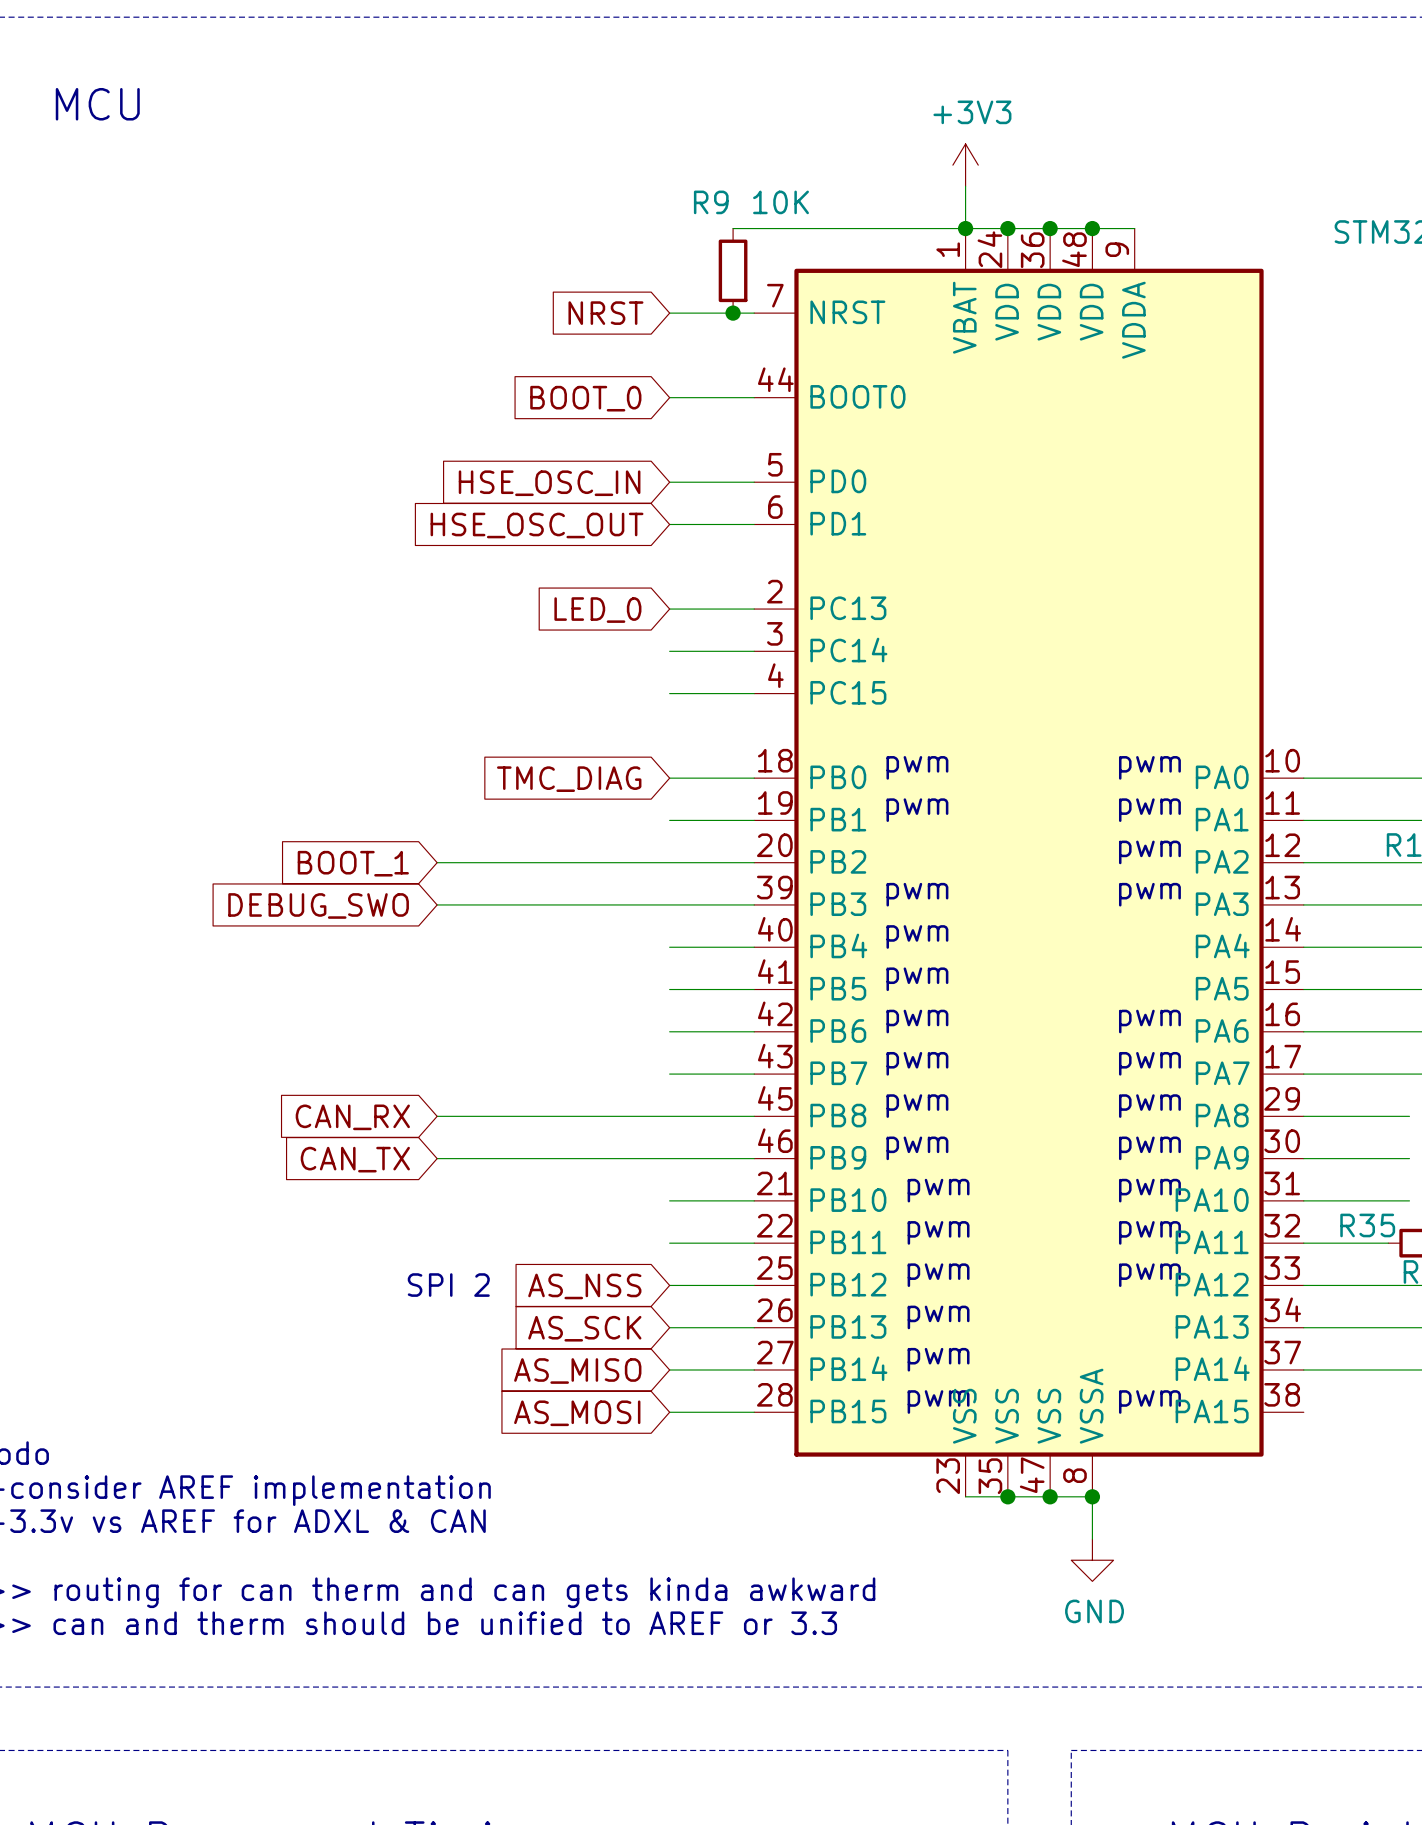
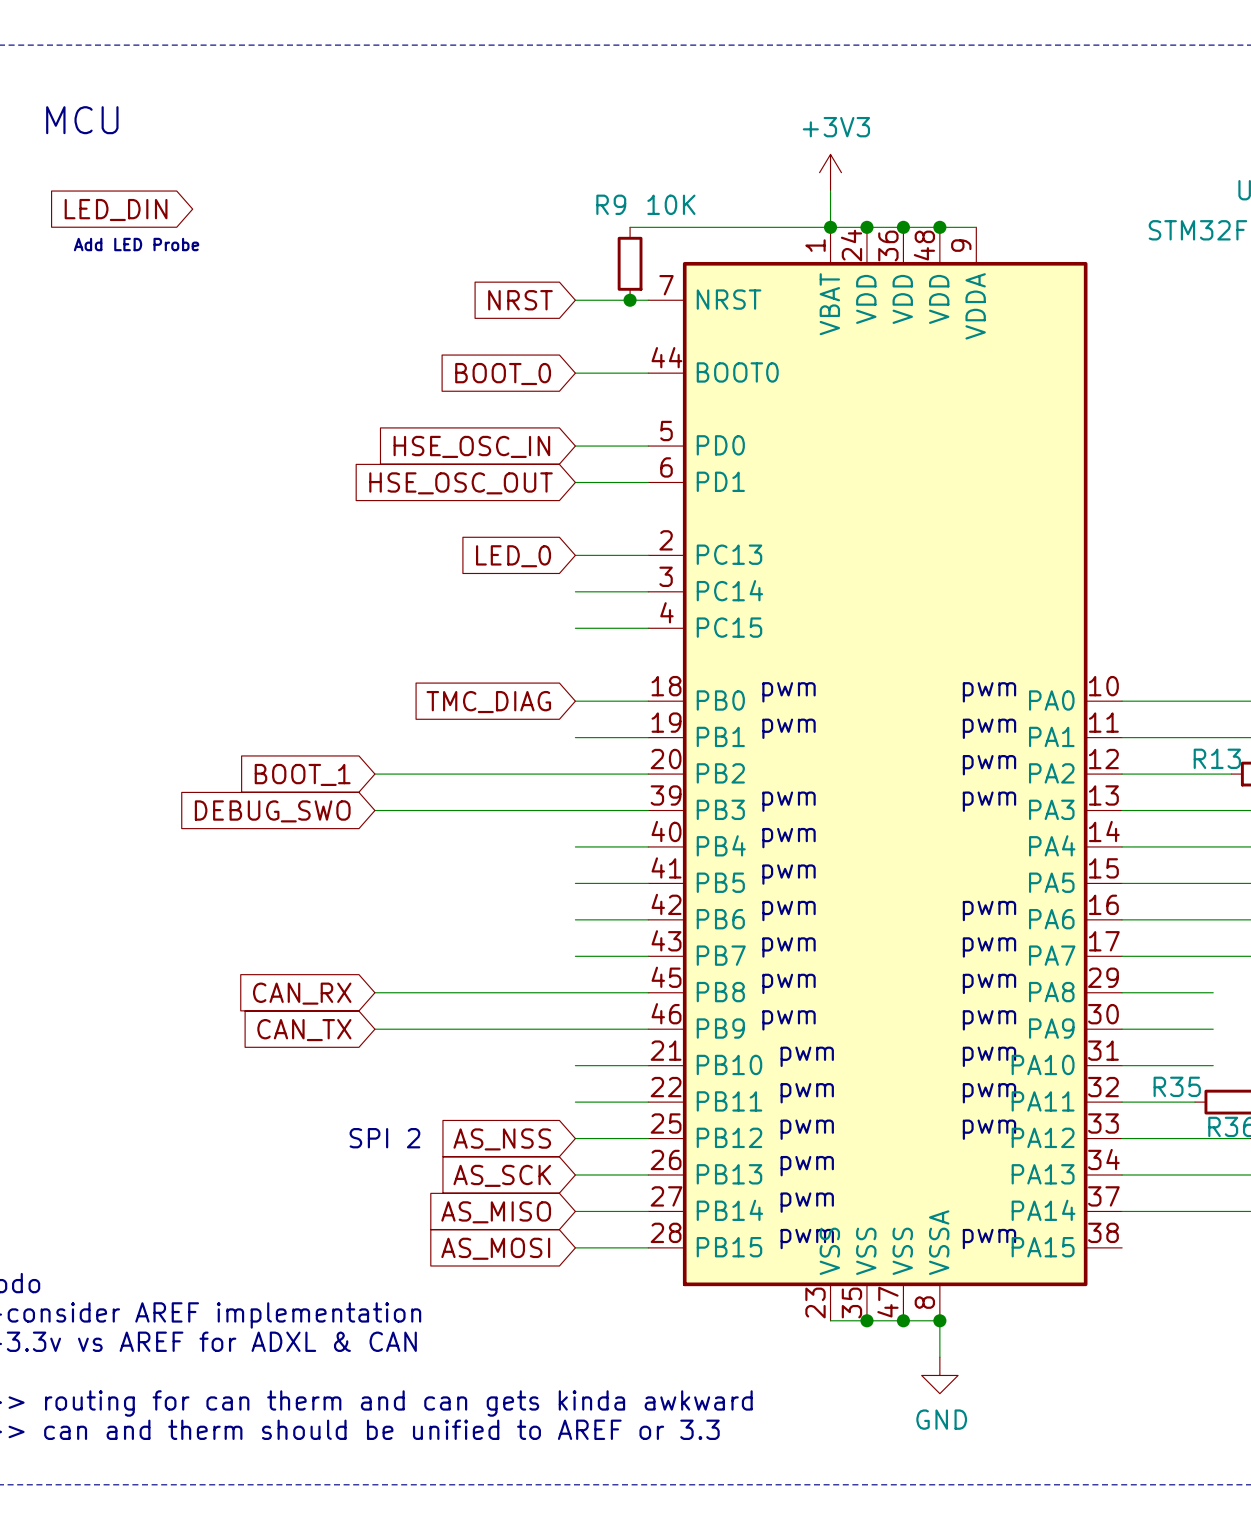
global label: none -> LED_DIN (116, 209)
text: none -> Add LED Probe (136, 244)

